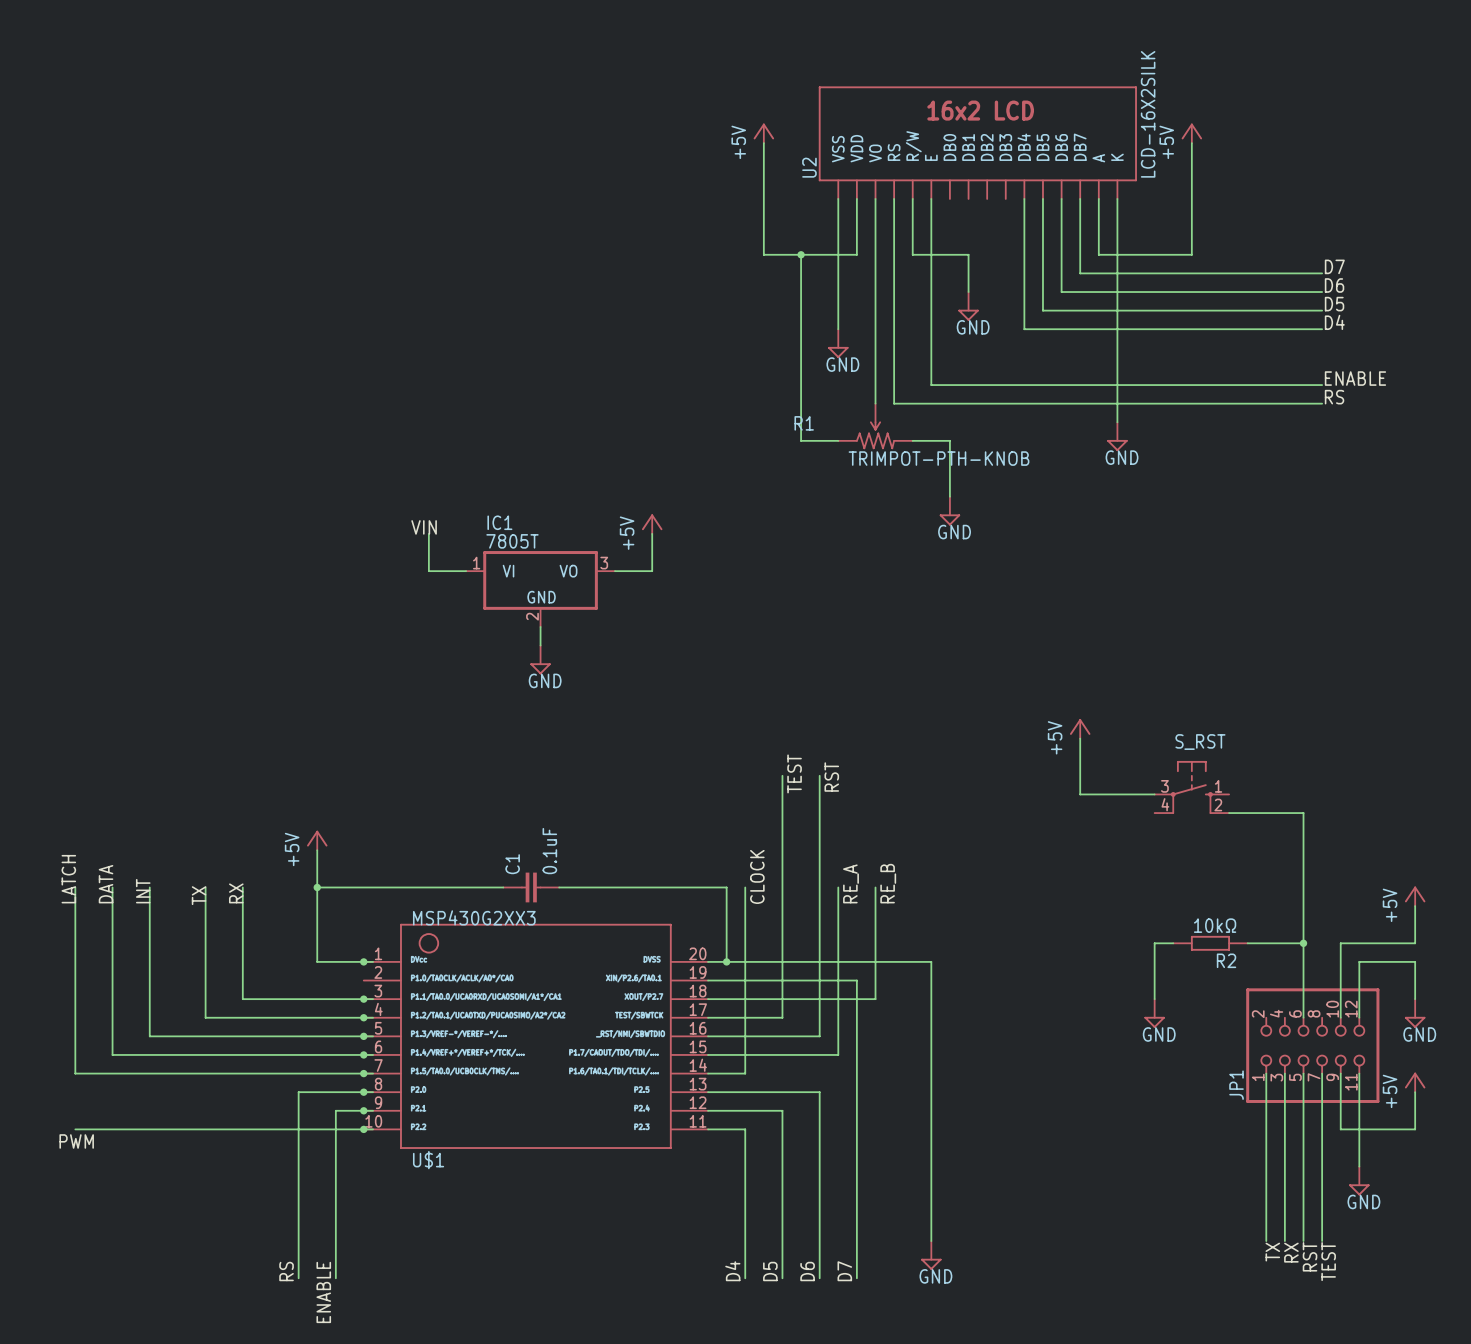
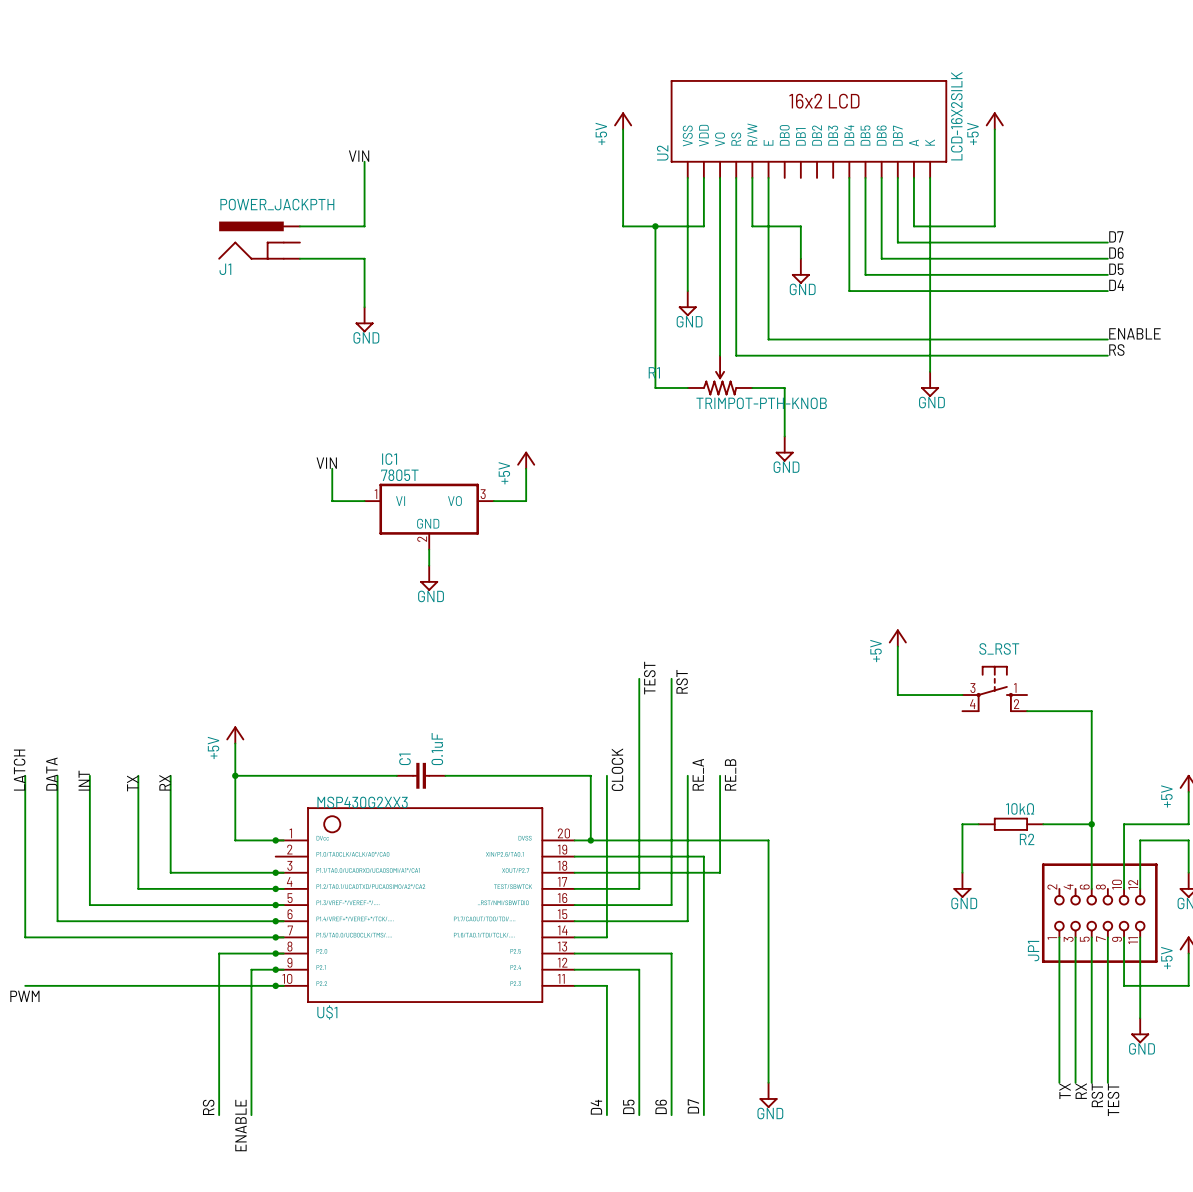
label: none -> VIN (359, 156)
wire: none -> (364, 161) (364, 226) (299, 226)
J1: none -> POWER_JACKPTH (259, 240)
wire: none -> (299, 258) (364, 258) (364, 307)
power symbol: none -> GND (364, 319)

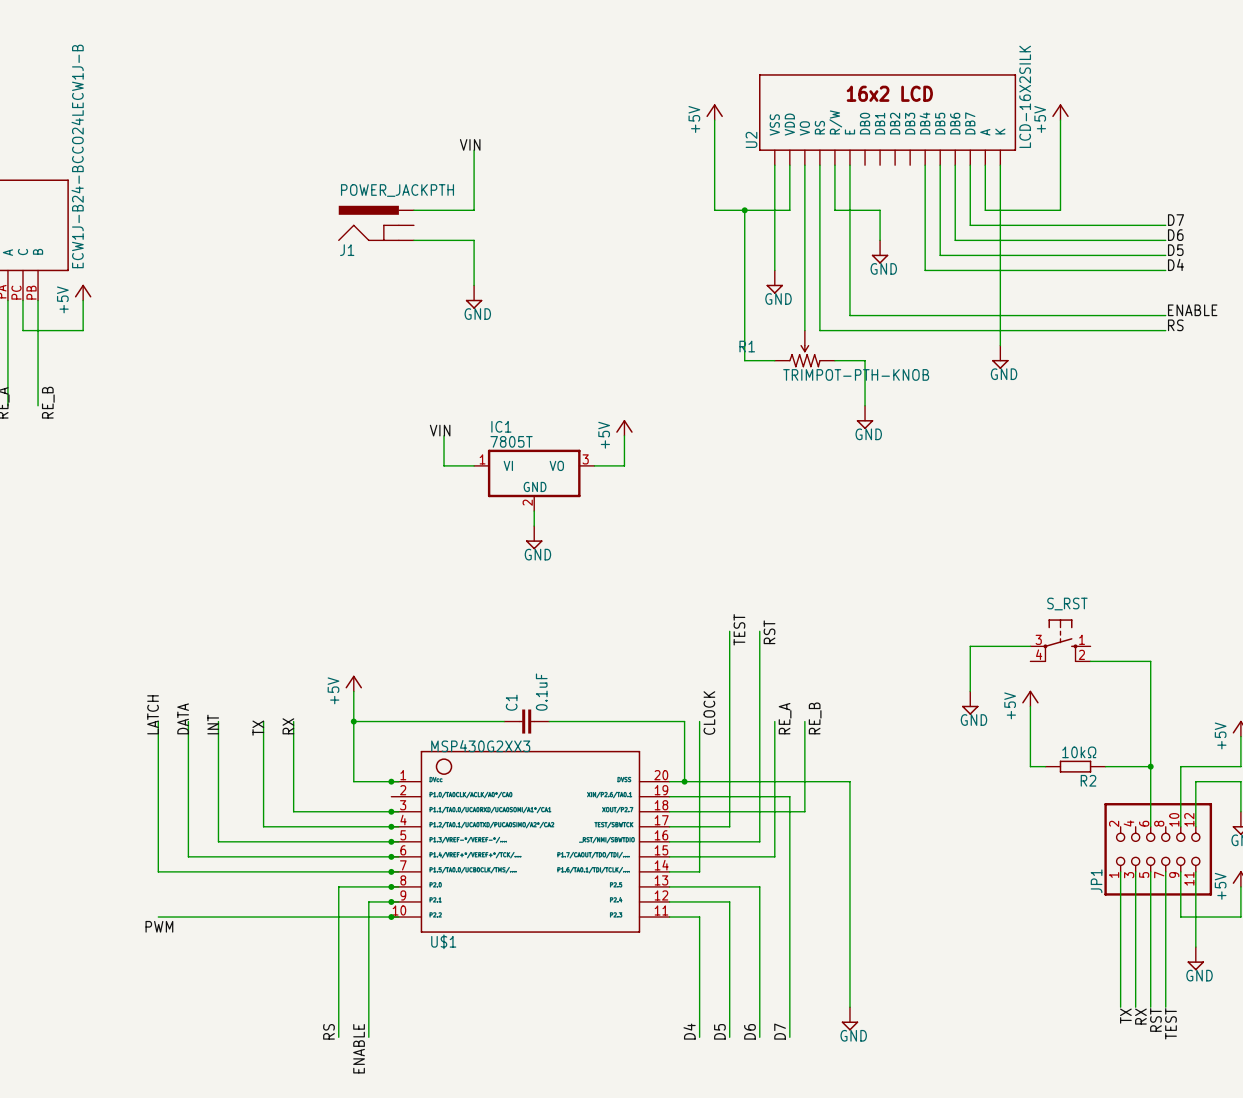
power symbol position: +5V (897, 638) -> +5V (1030, 698)
wire: (897, 646) (897, 695) -> (970, 691) (970, 646)
wire: (962, 824) (962, 872) -> (1030, 766) (1030, 706)
power symbol position: GND (962, 885) -> GND (970, 703)

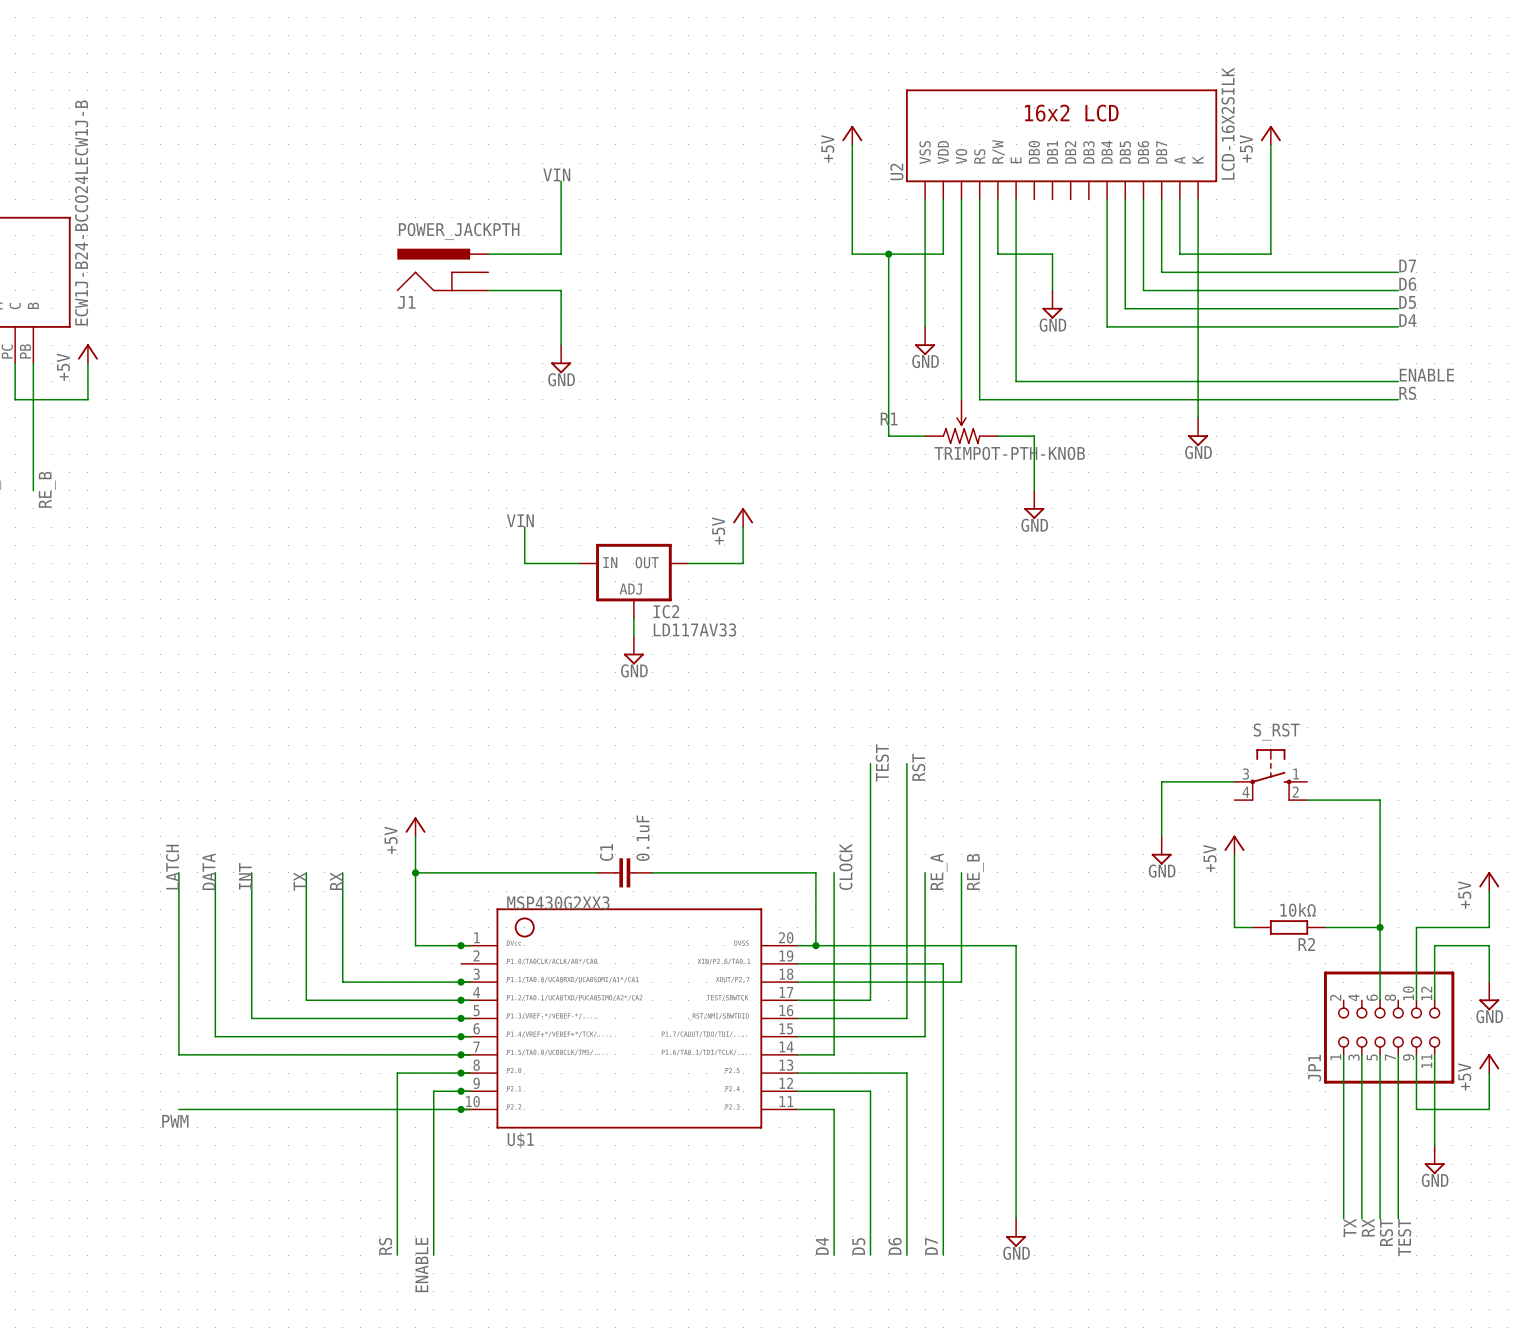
IC1: 7805T (534, 480) -> none
IC2: none -> LD117AV33 (633, 580)

